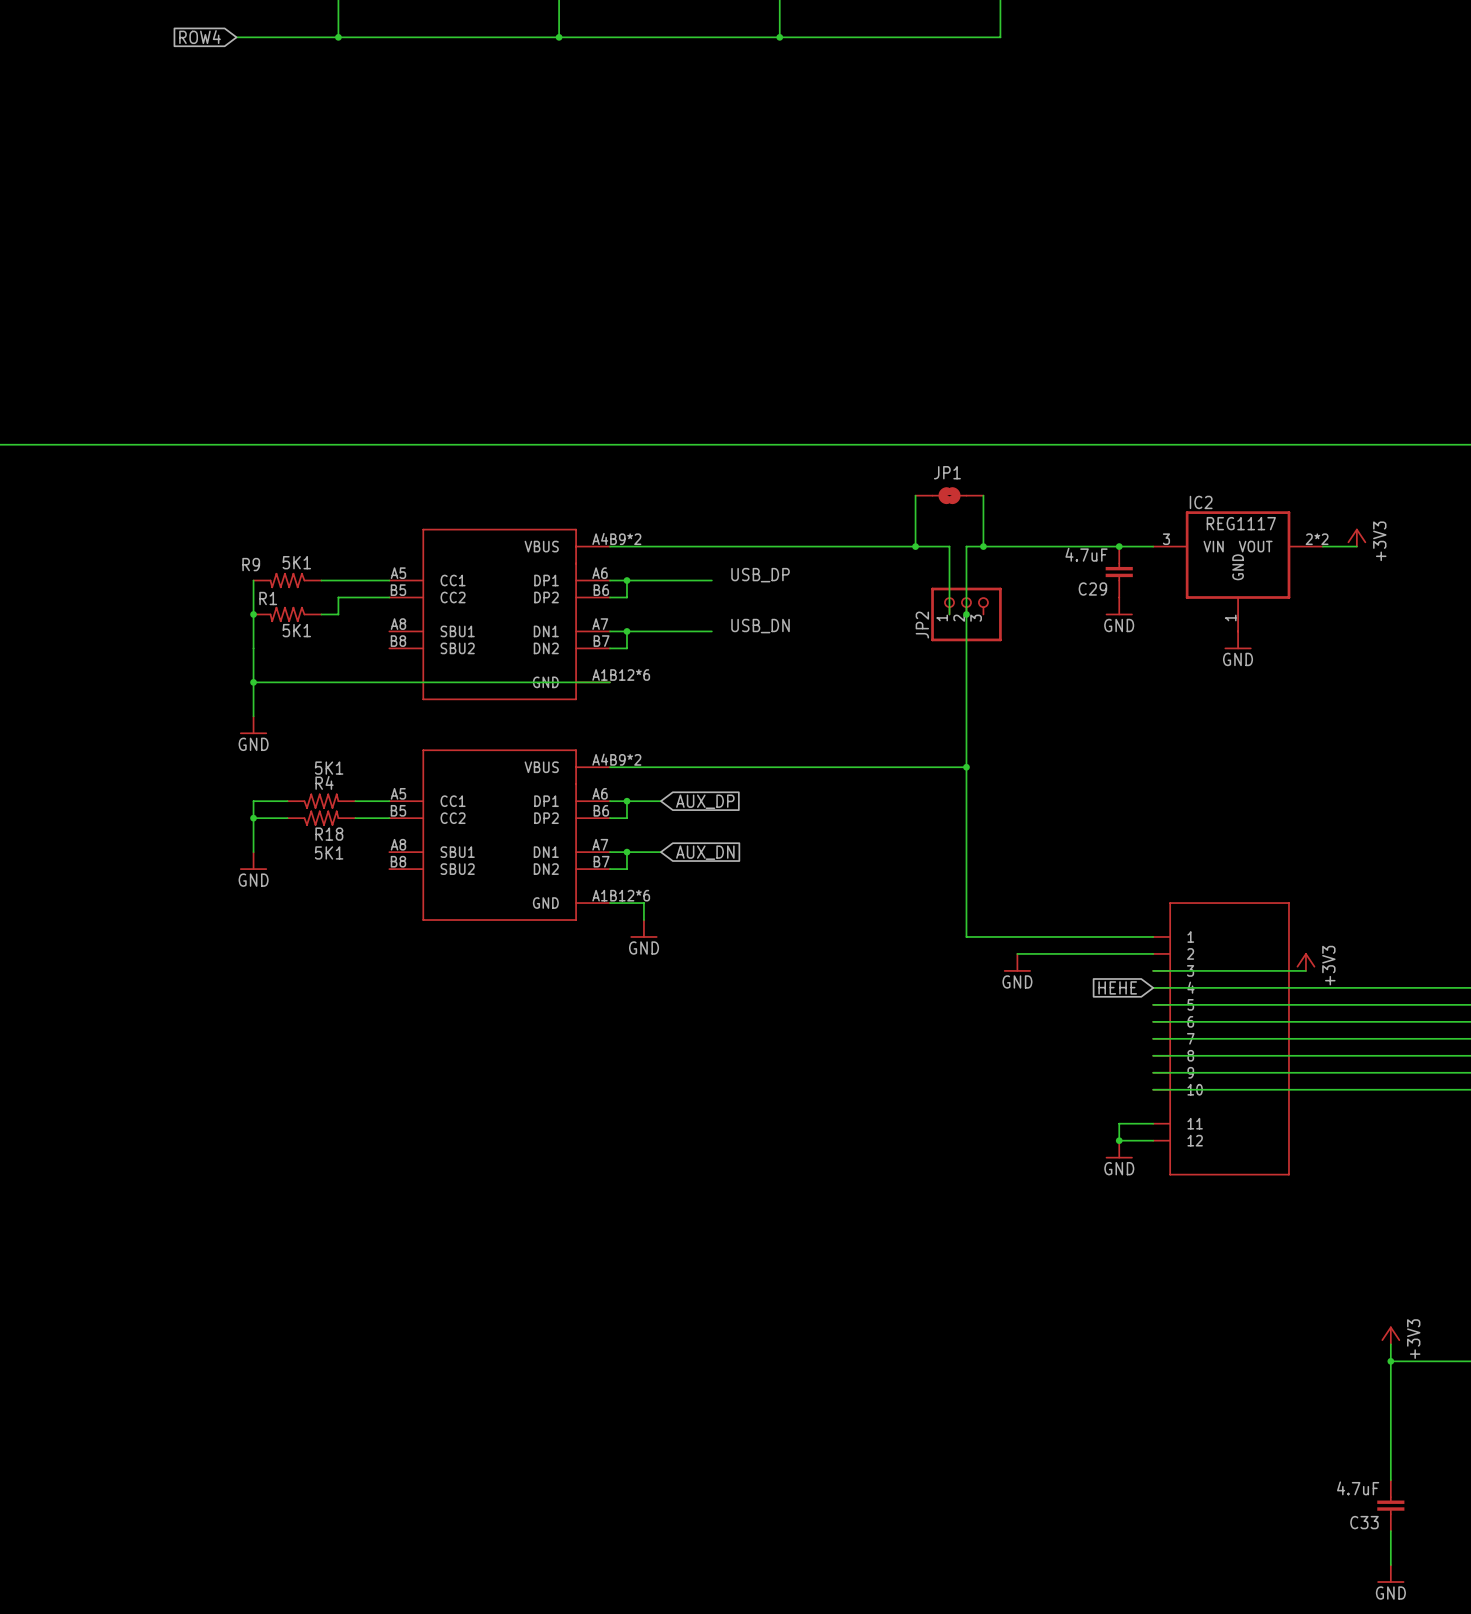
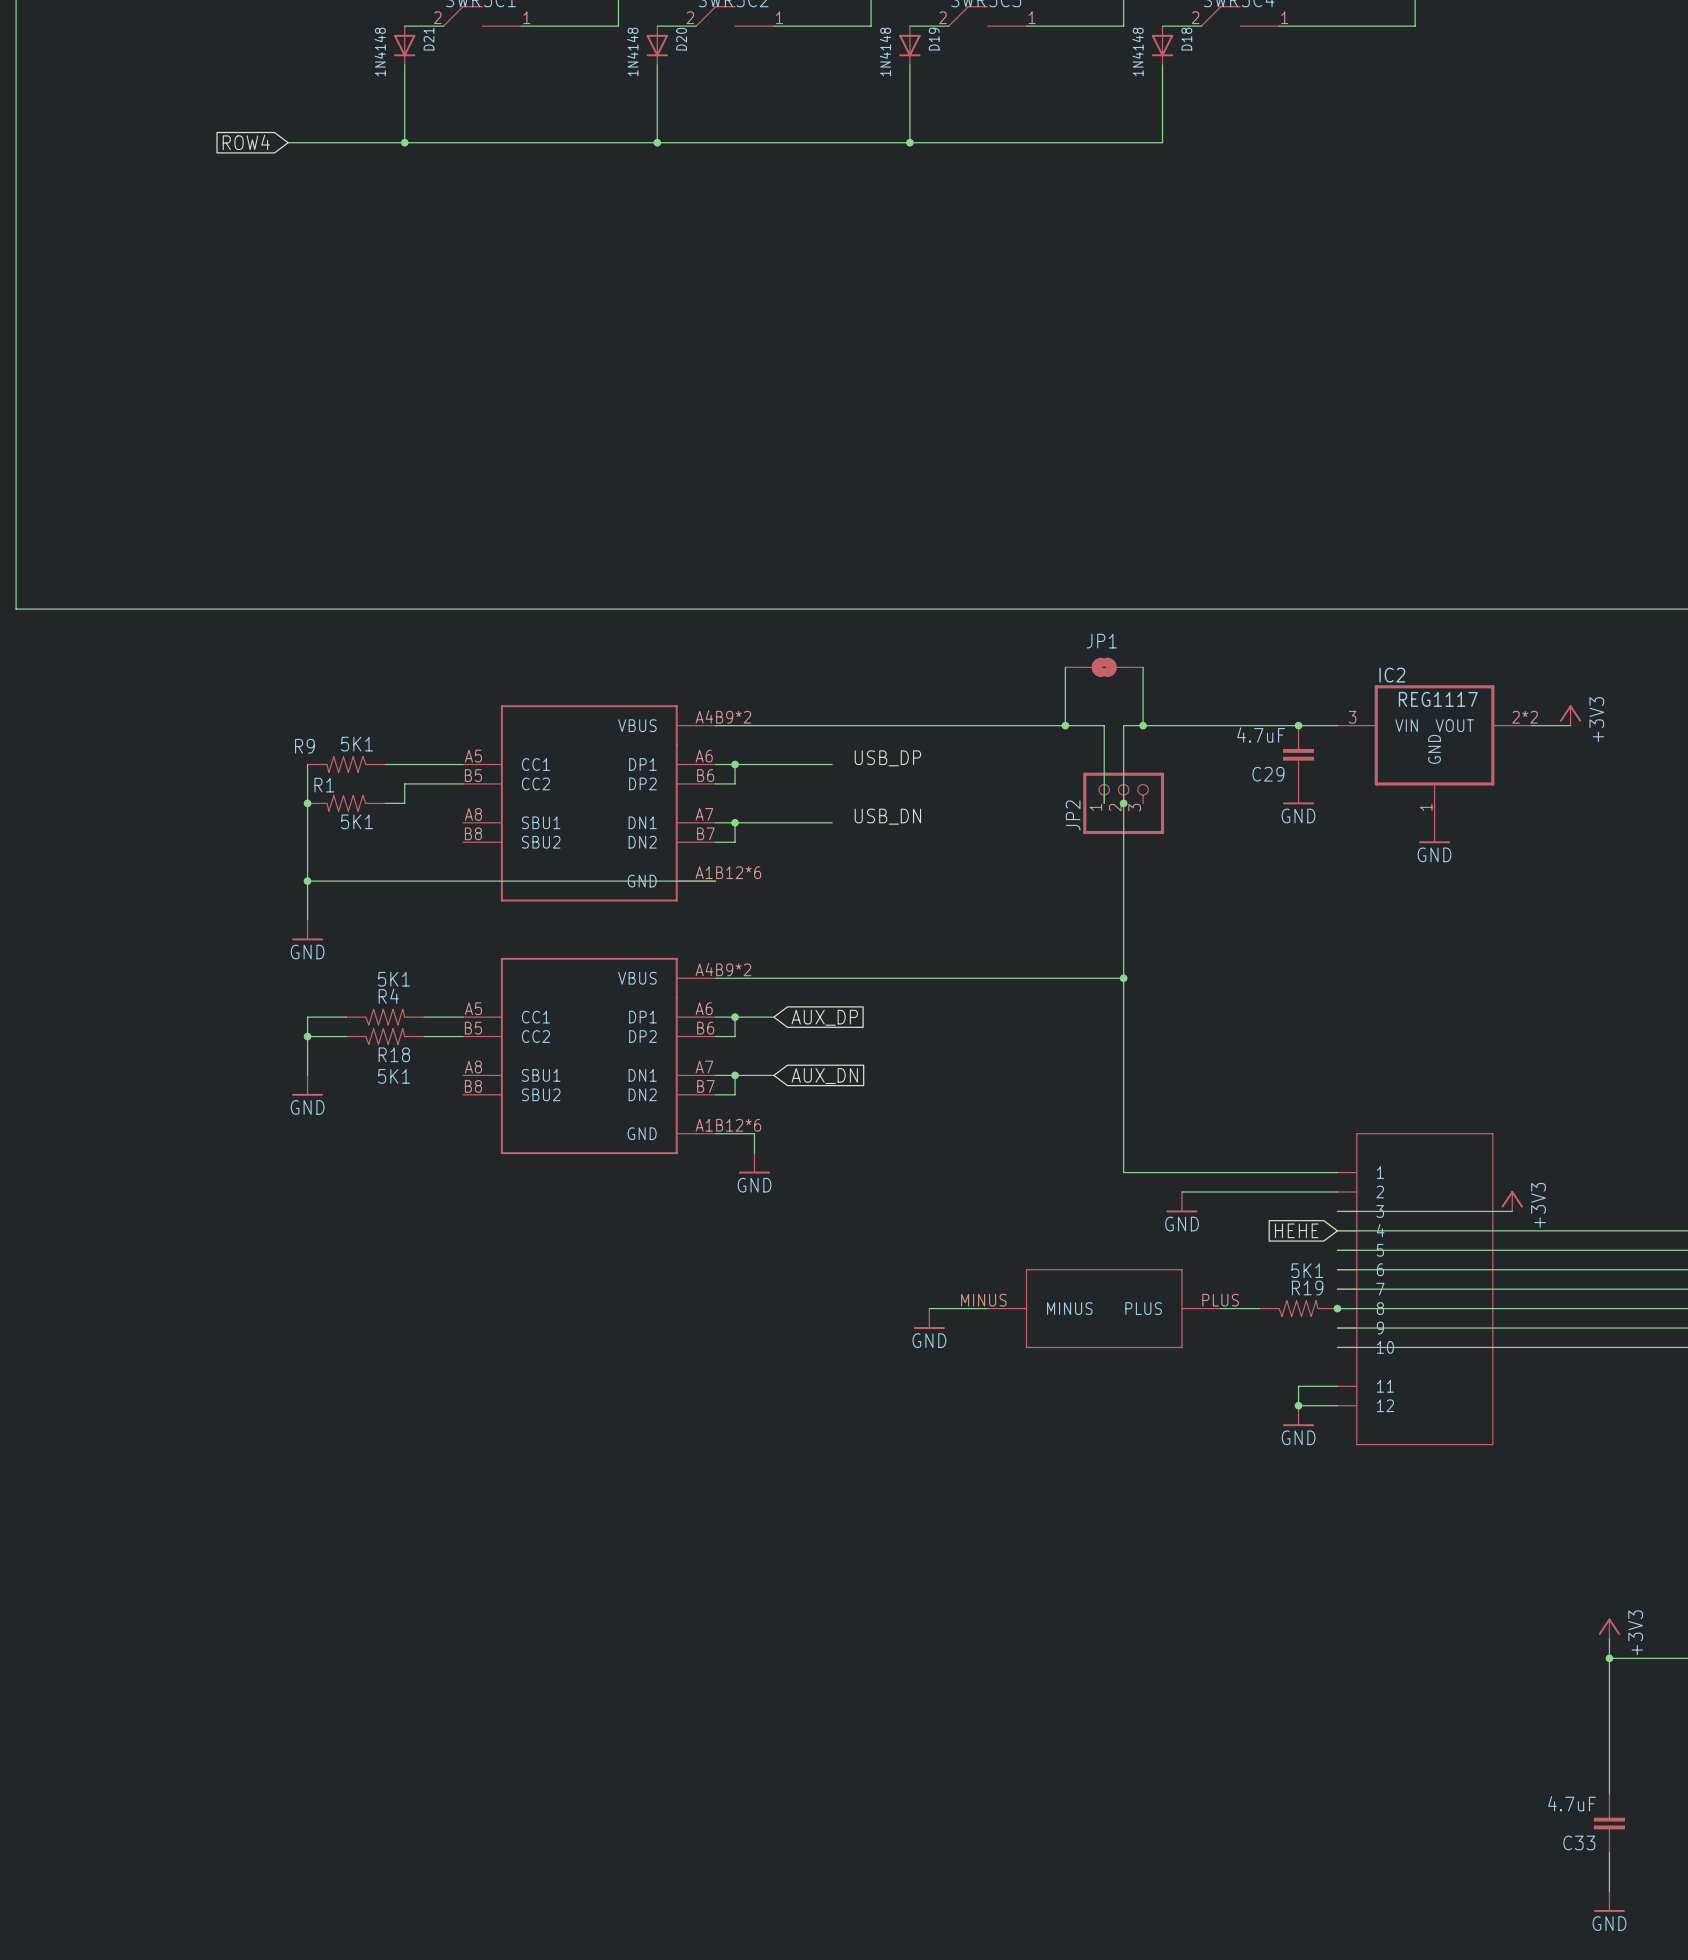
wire: none -> (929, 1308) (987, 1308)
part: none -> (1104, 1308)
wire: none -> (1220, 1308) (1259, 1308)
R19: none -> 5K1 (1298, 1308)
junction: none -> (1337, 1308)
power symbol: none -> GND (929, 1318)

